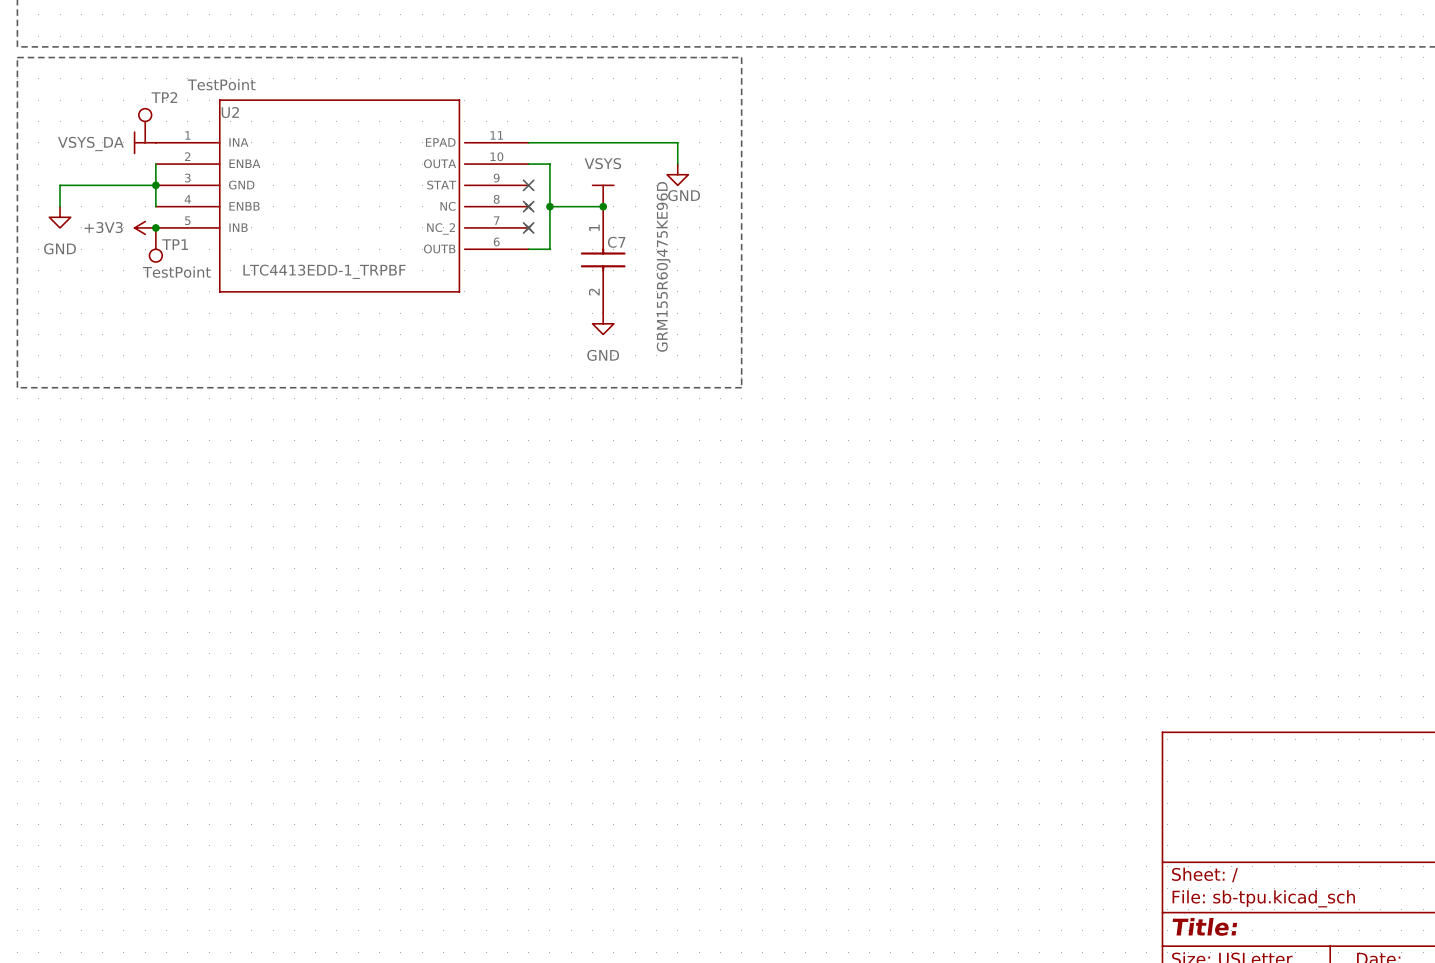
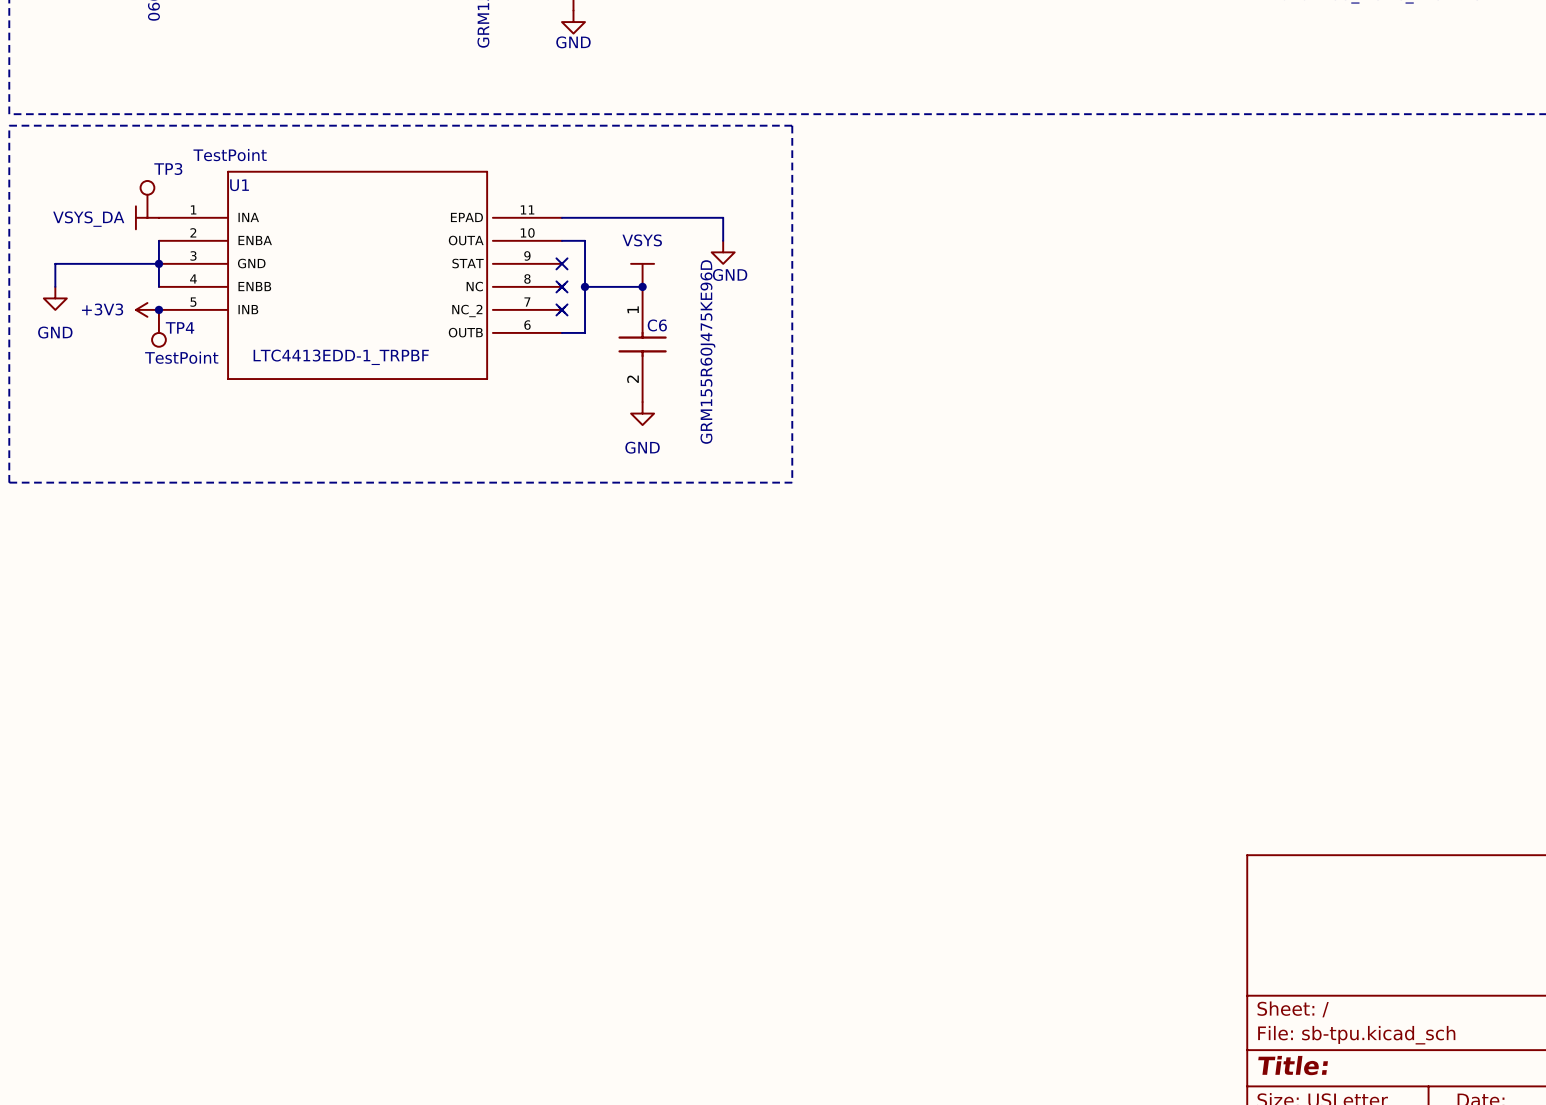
TP2 name: TP2 (164, 97) -> TP3 (168, 169)
U2 name: U2 (230, 112) -> U1 (239, 185)
C7 name: C7 (616, 242) -> C6 (657, 325)
TP1 name: TP1 (175, 244) -> TP4 (180, 327)

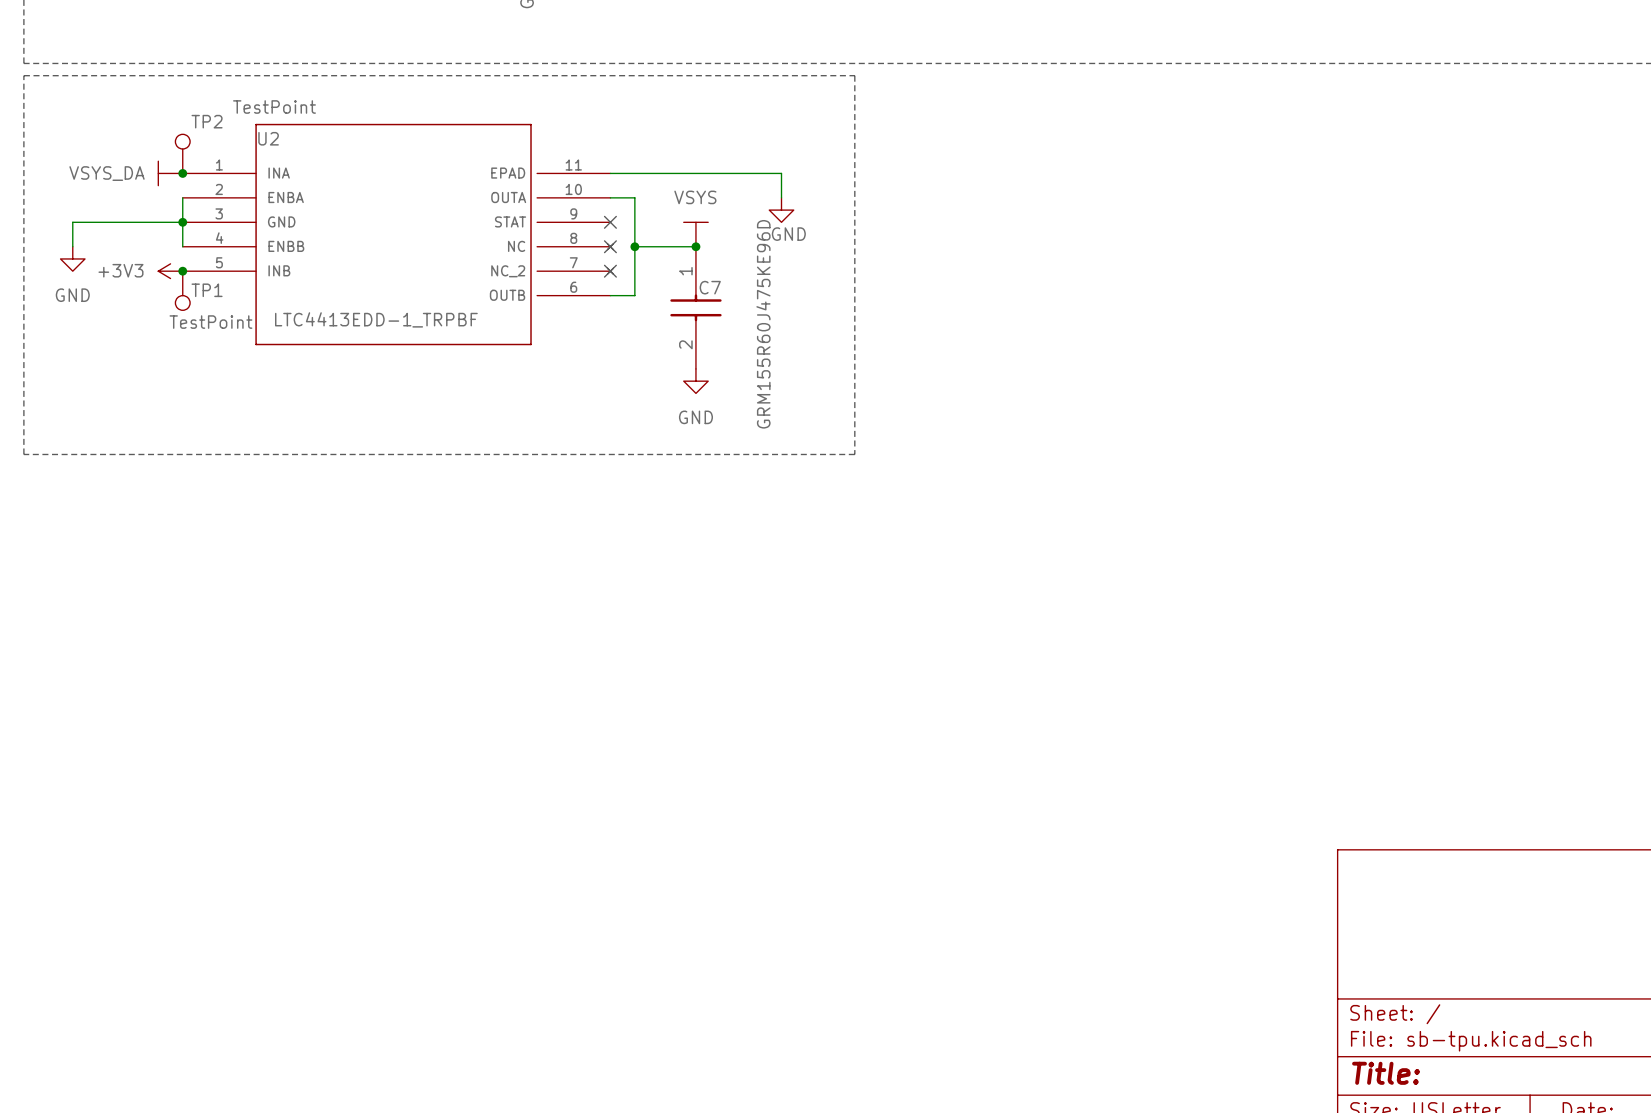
U1 name: U1 (239, 185) -> U2 (268, 138)
TP3: TestPoint (147, 199) -> none
TP2: none -> TestPoint (182, 153)
junction: none -> (182, 173)
C6 name: C6 (657, 325) -> C7 (710, 287)
TP4 name: TP4 (180, 327) -> TP1 (207, 290)

